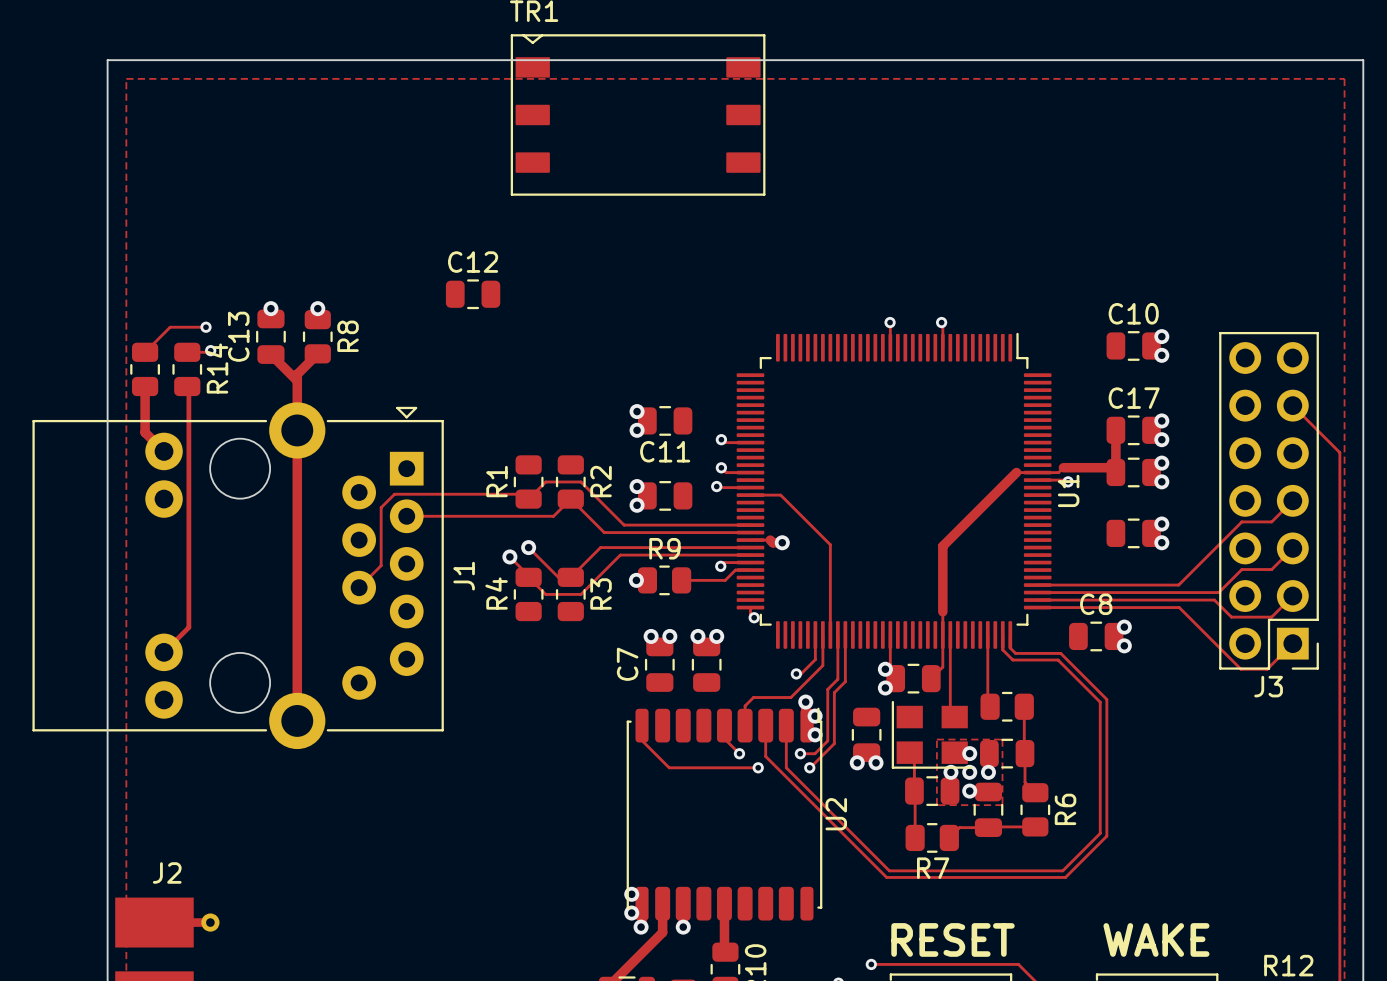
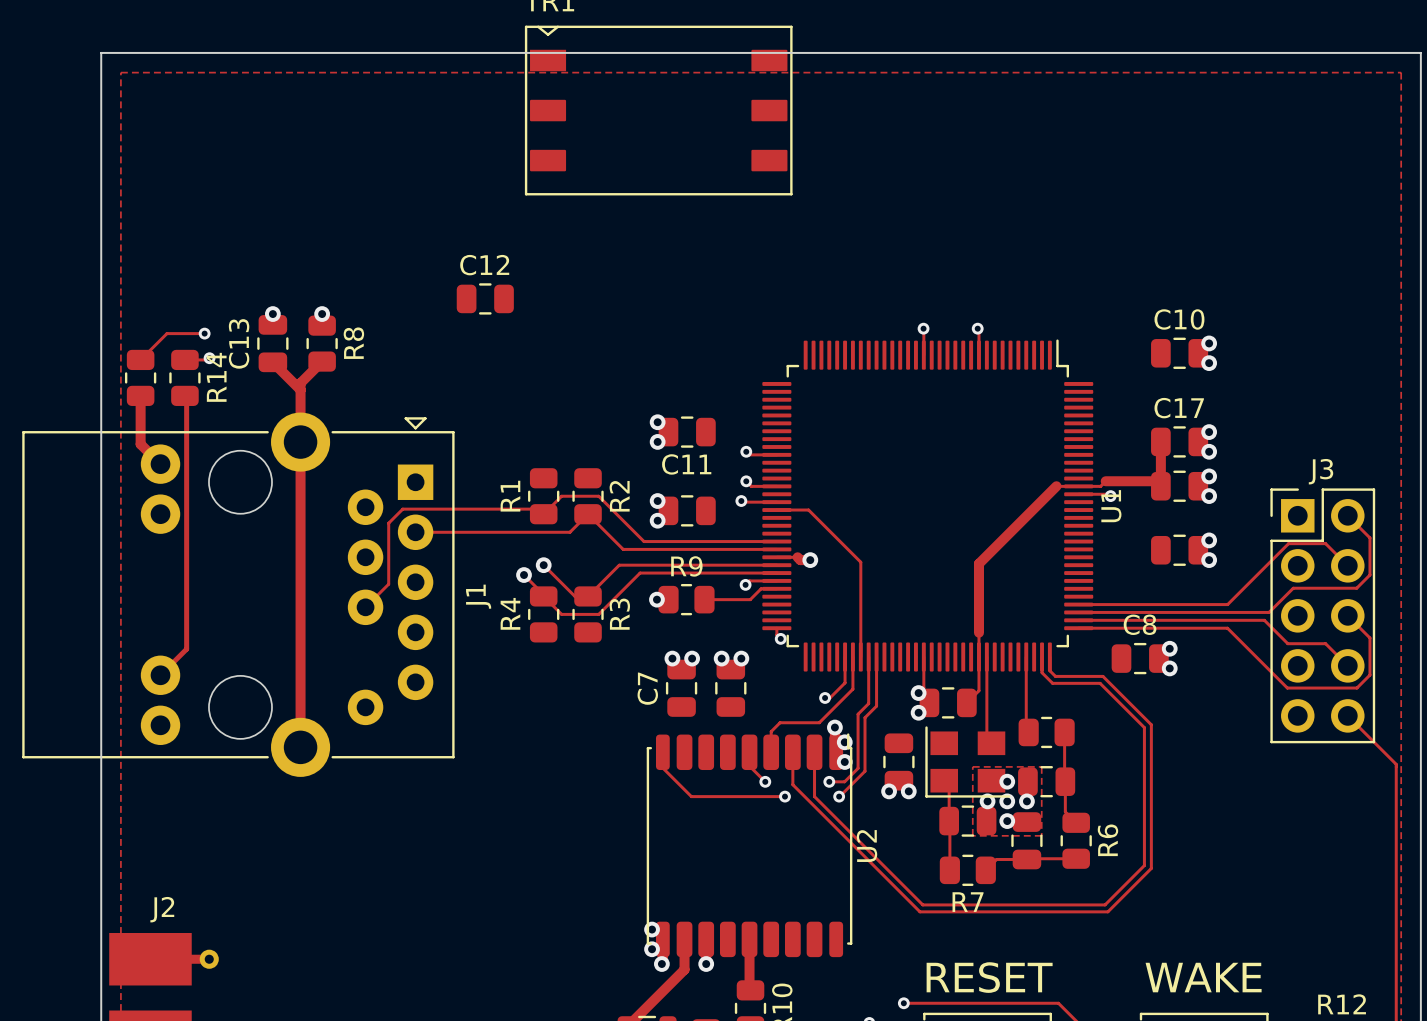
J3 footprint: [1219, 331, 1319, 670] -> [1270, 488, 1376, 744]
track: (1292, 405) (1339, 452) (1339, 737) -> (1347, 715) (1396, 764)
track: (1292, 500) (1271, 521) (1241, 521) (1178, 585) -> (1347, 565) (1325, 543) (1288, 543) (1226, 604)
track: (1292, 548) (1271, 569) -> (1347, 515) (1369, 537) (1369, 575) (1356, 588) (1324, 588)
track: (1292, 596) (1271, 617) (1231, 617) -> (1347, 665) (1325, 643) (1287, 643) (1282, 638)
track: (1292, 643) (1267, 669) (1241, 669) (1236, 664) -> (1347, 615) (1369, 638) (1369, 675) (1356, 688) (1287, 688)
J3 name position: J3 (1268, 686) -> J3 (1321, 471)

